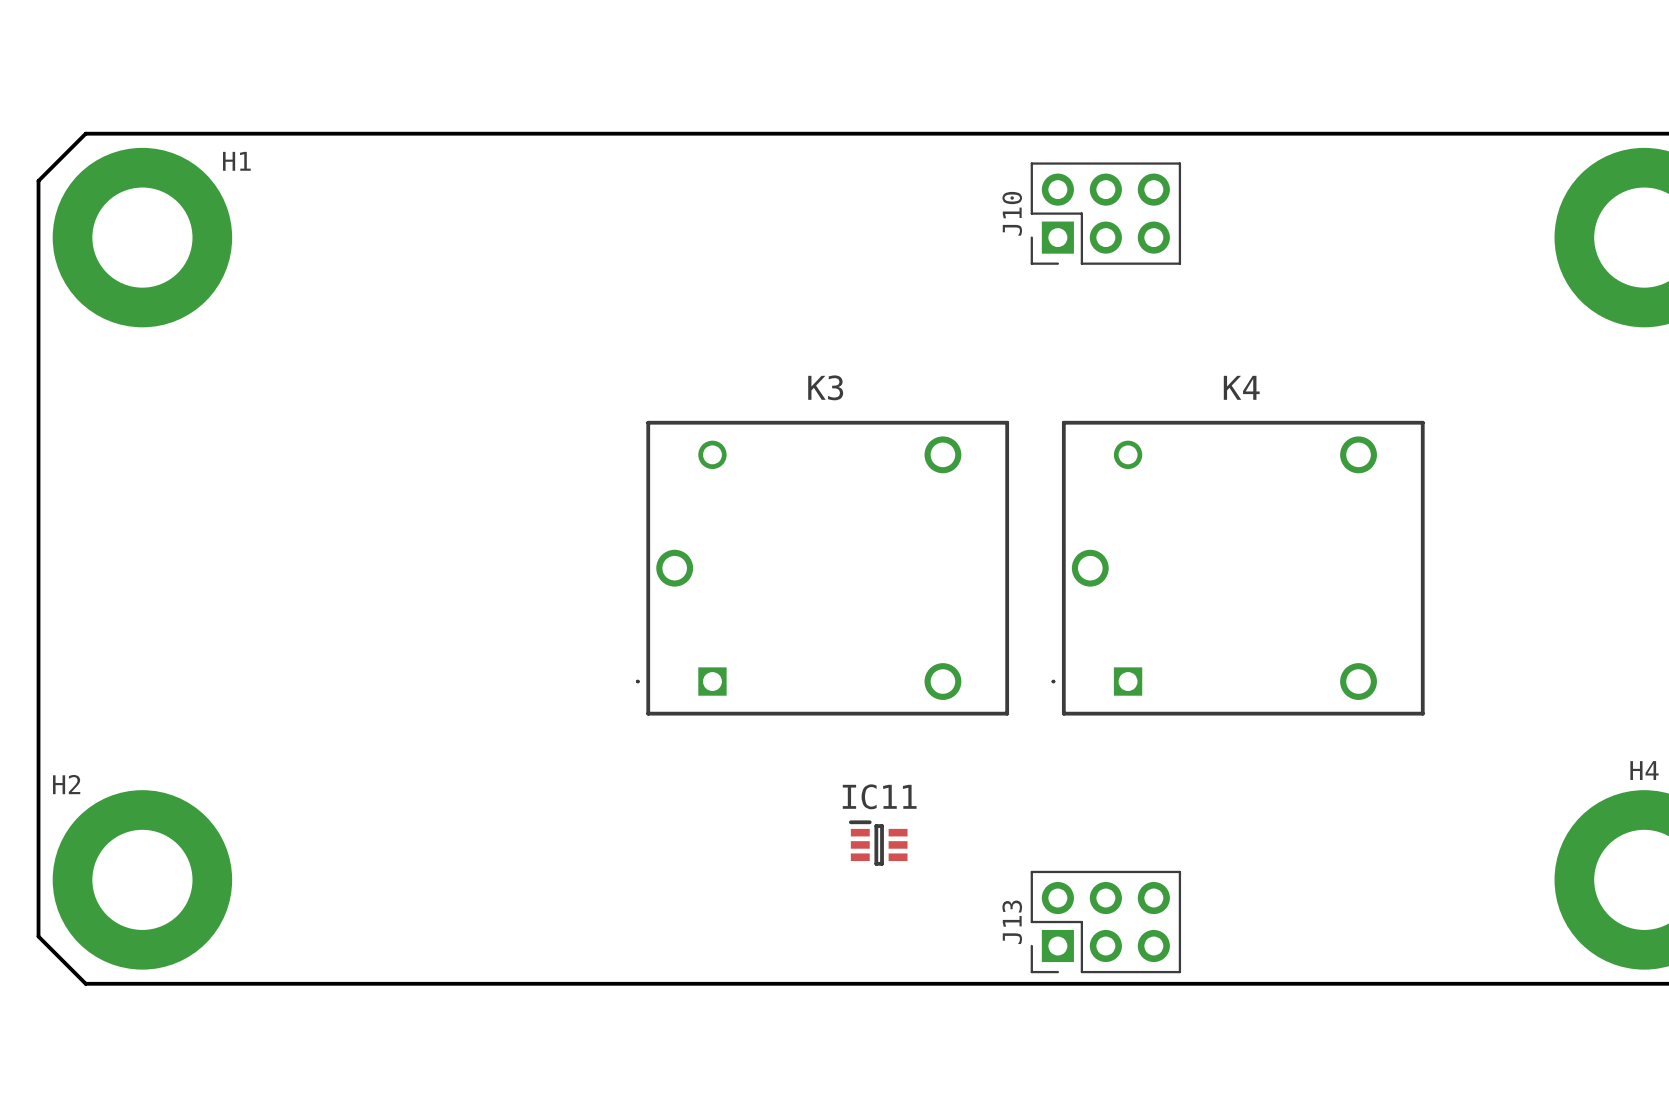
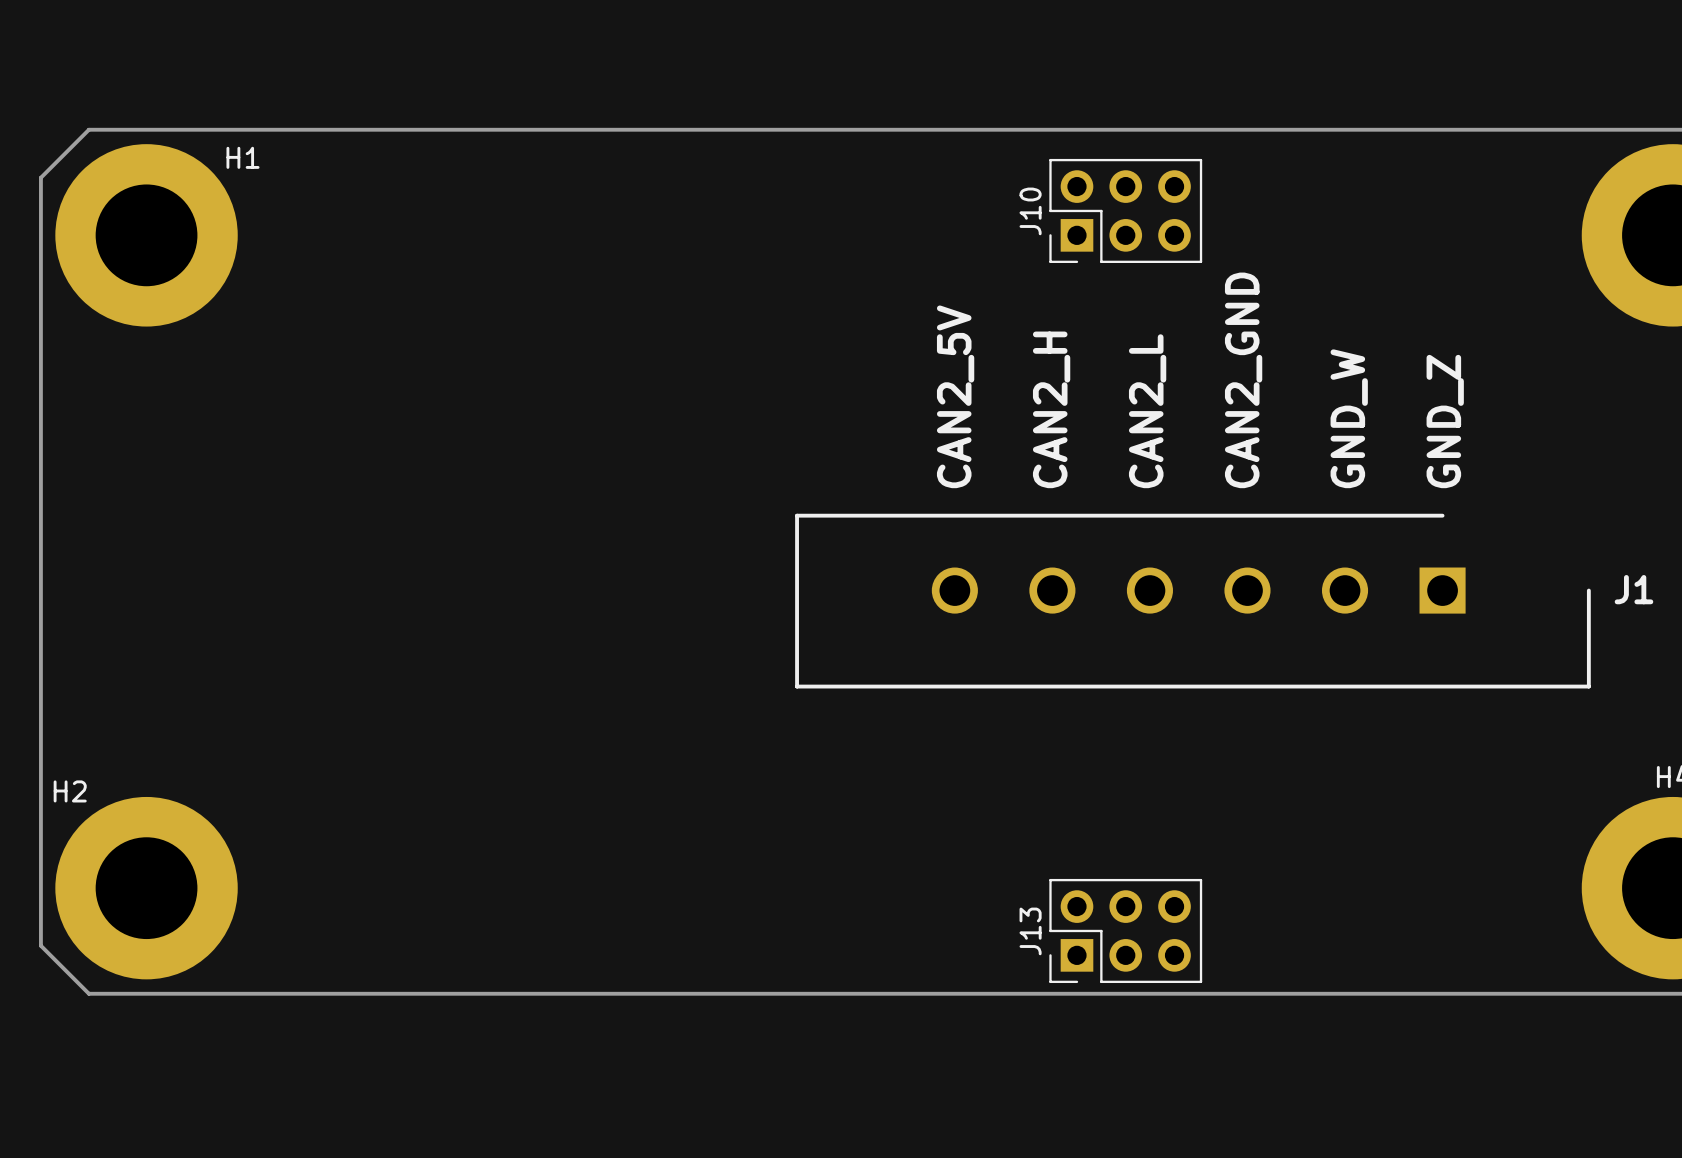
text: none -> CAN2_GND (1243, 380)
text: none -> CAN2_5V (955, 396)
text: none -> CAN2_L (1147, 411)
text: none -> CAN2_H (1051, 409)
text: none -> GND_W (1349, 418)
text: none -> GND_Z (1445, 421)
K3: (822, 568) -> none
K4: (1238, 568) -> none
J1: none -> (1192, 601)
IC11: (878, 843) -> none

